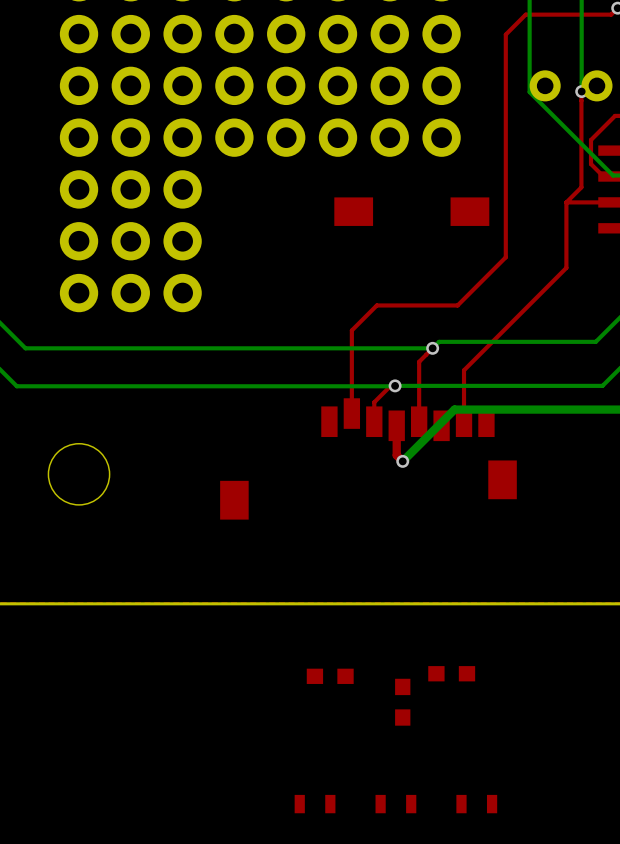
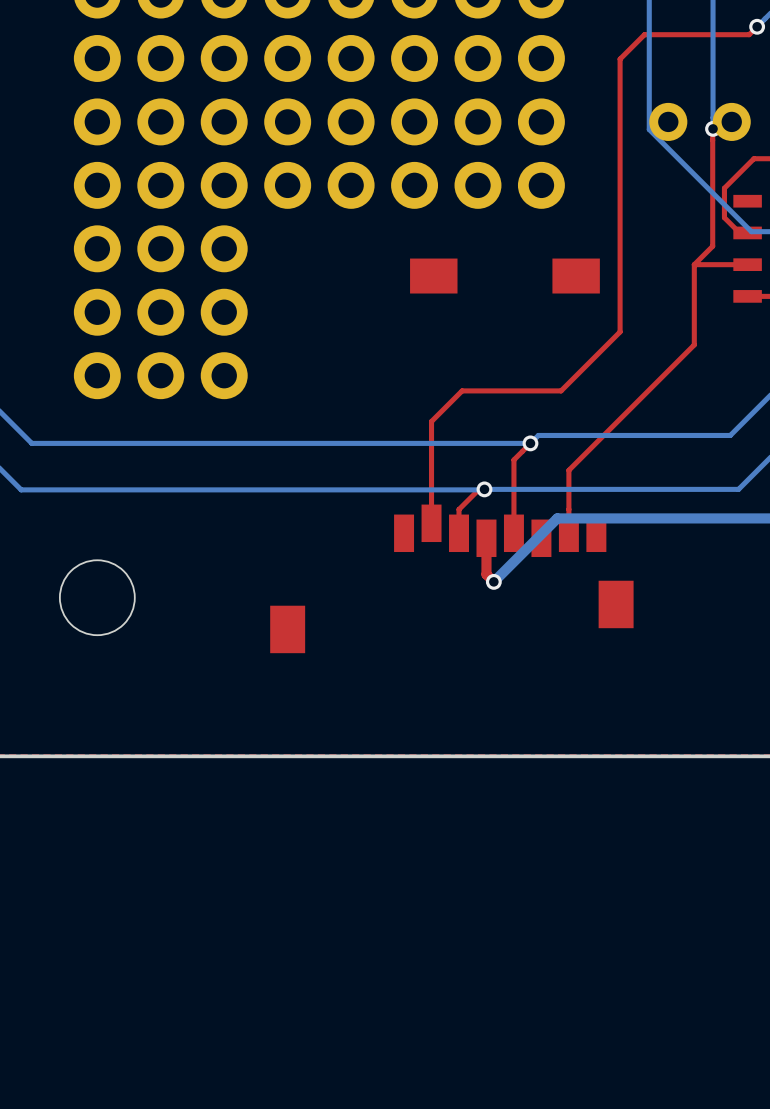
part: (451, 673) -> none
part: (330, 676) -> none
part: (402, 702) -> none
part: (315, 804) -> none
part: (395, 804) -> none
part: (476, 804) -> none

